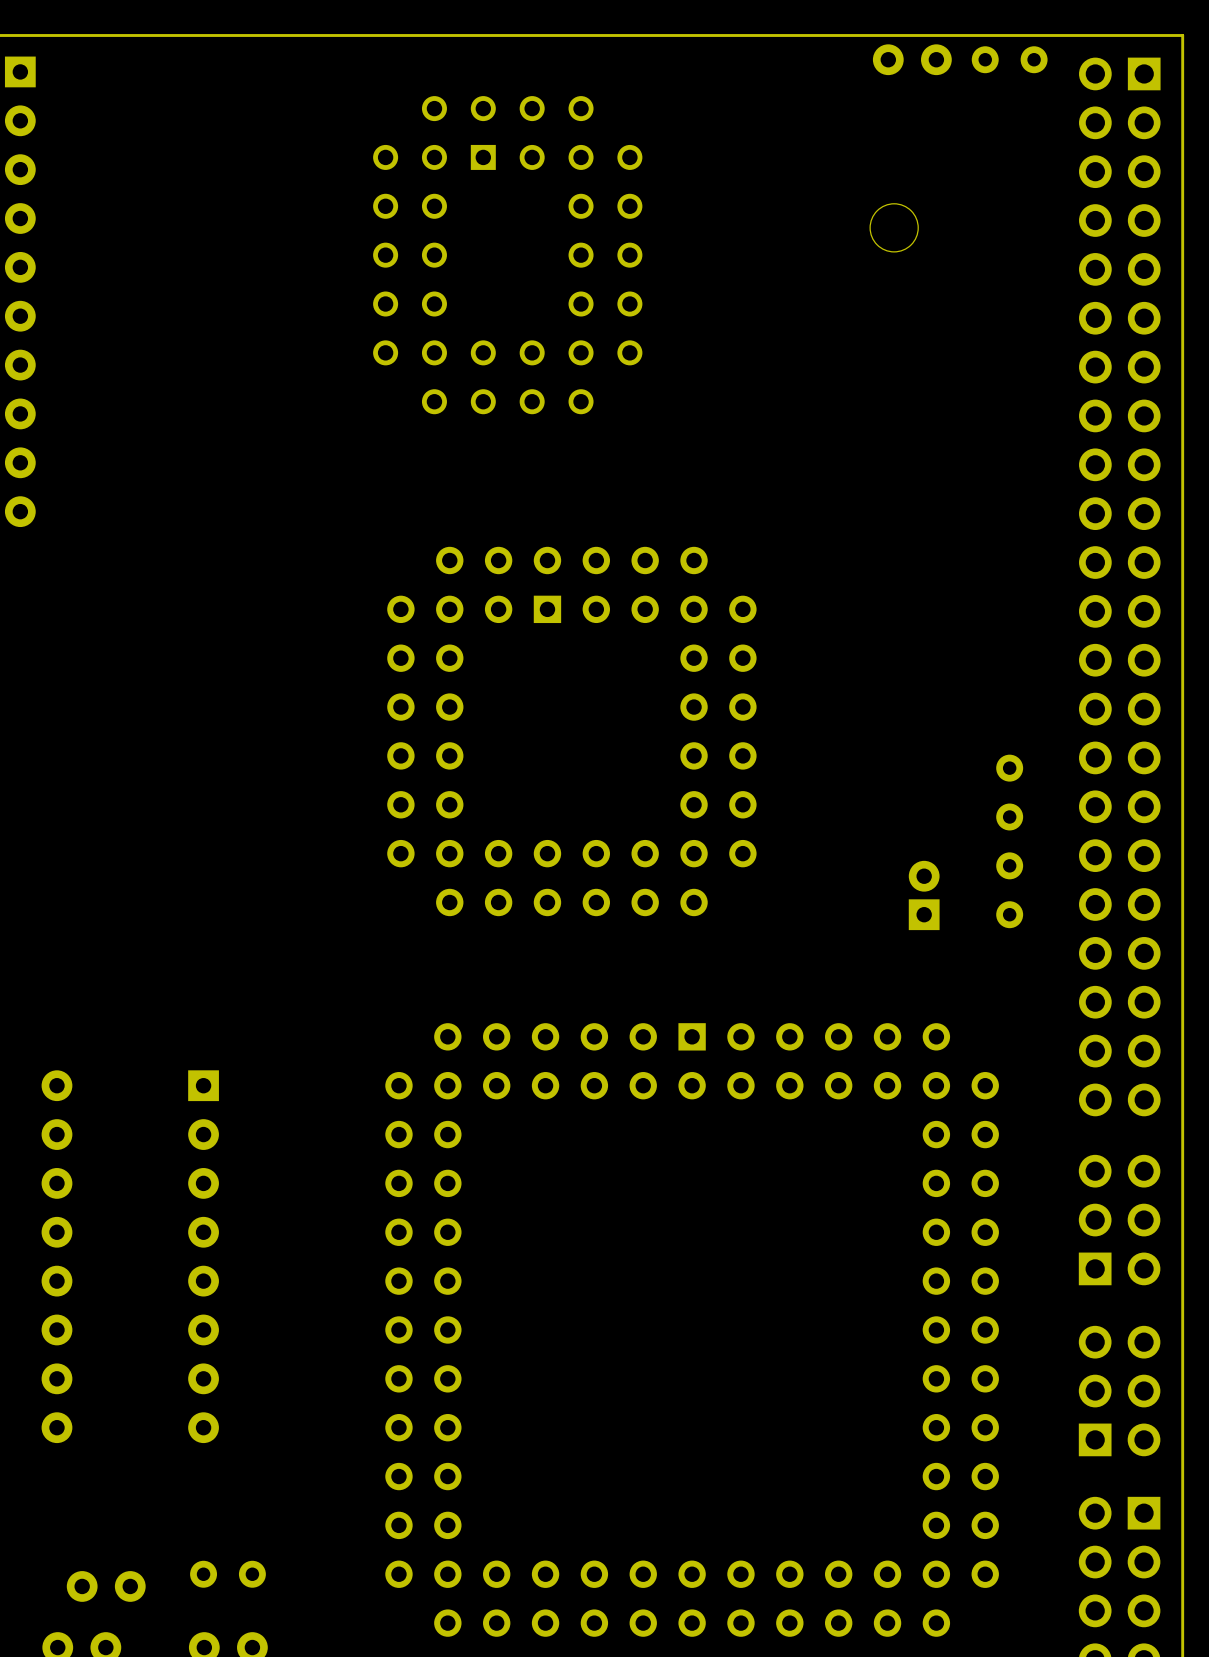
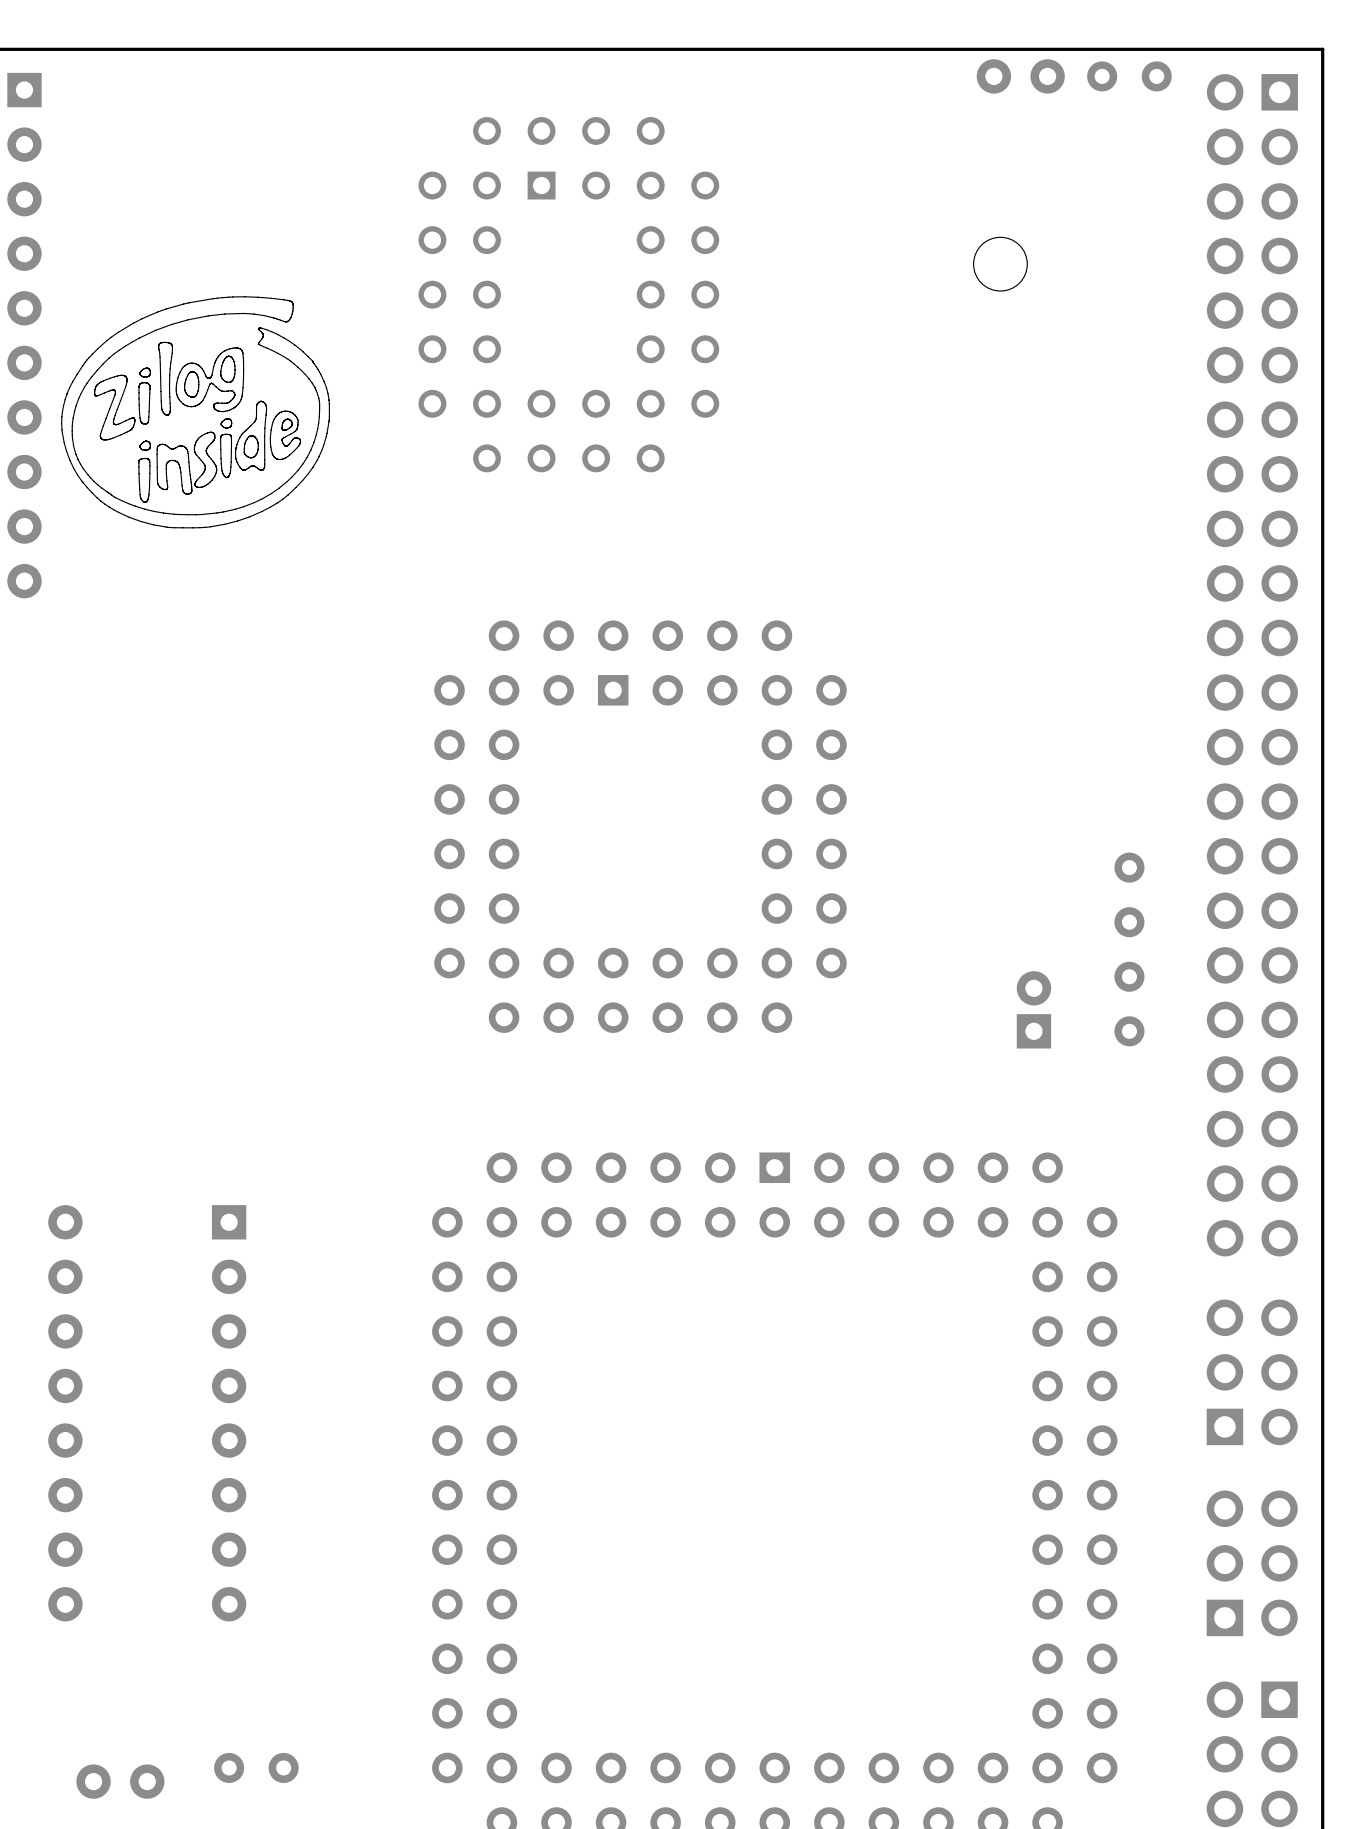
drawing: none -> [61, 296, 330, 529]

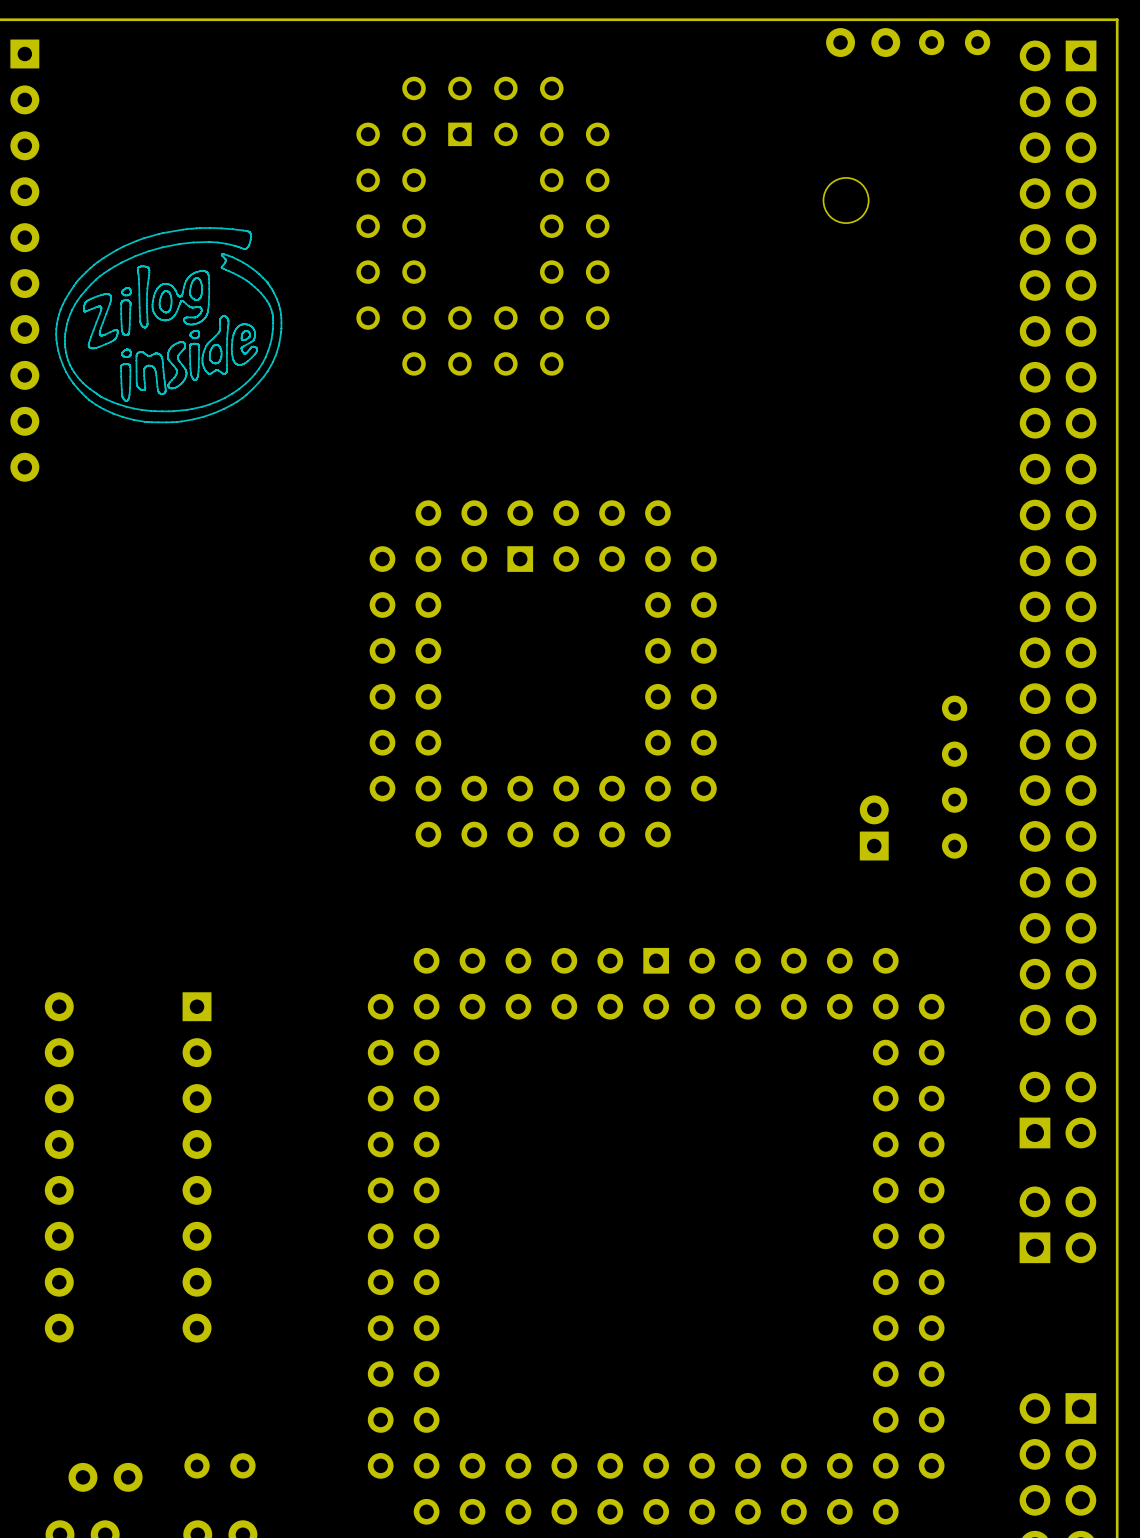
part: none -> (1057, 1110)
part: (1252, 1372) -> none
part: none -> (1057, 1224)
part: (1252, 1563) -> none

